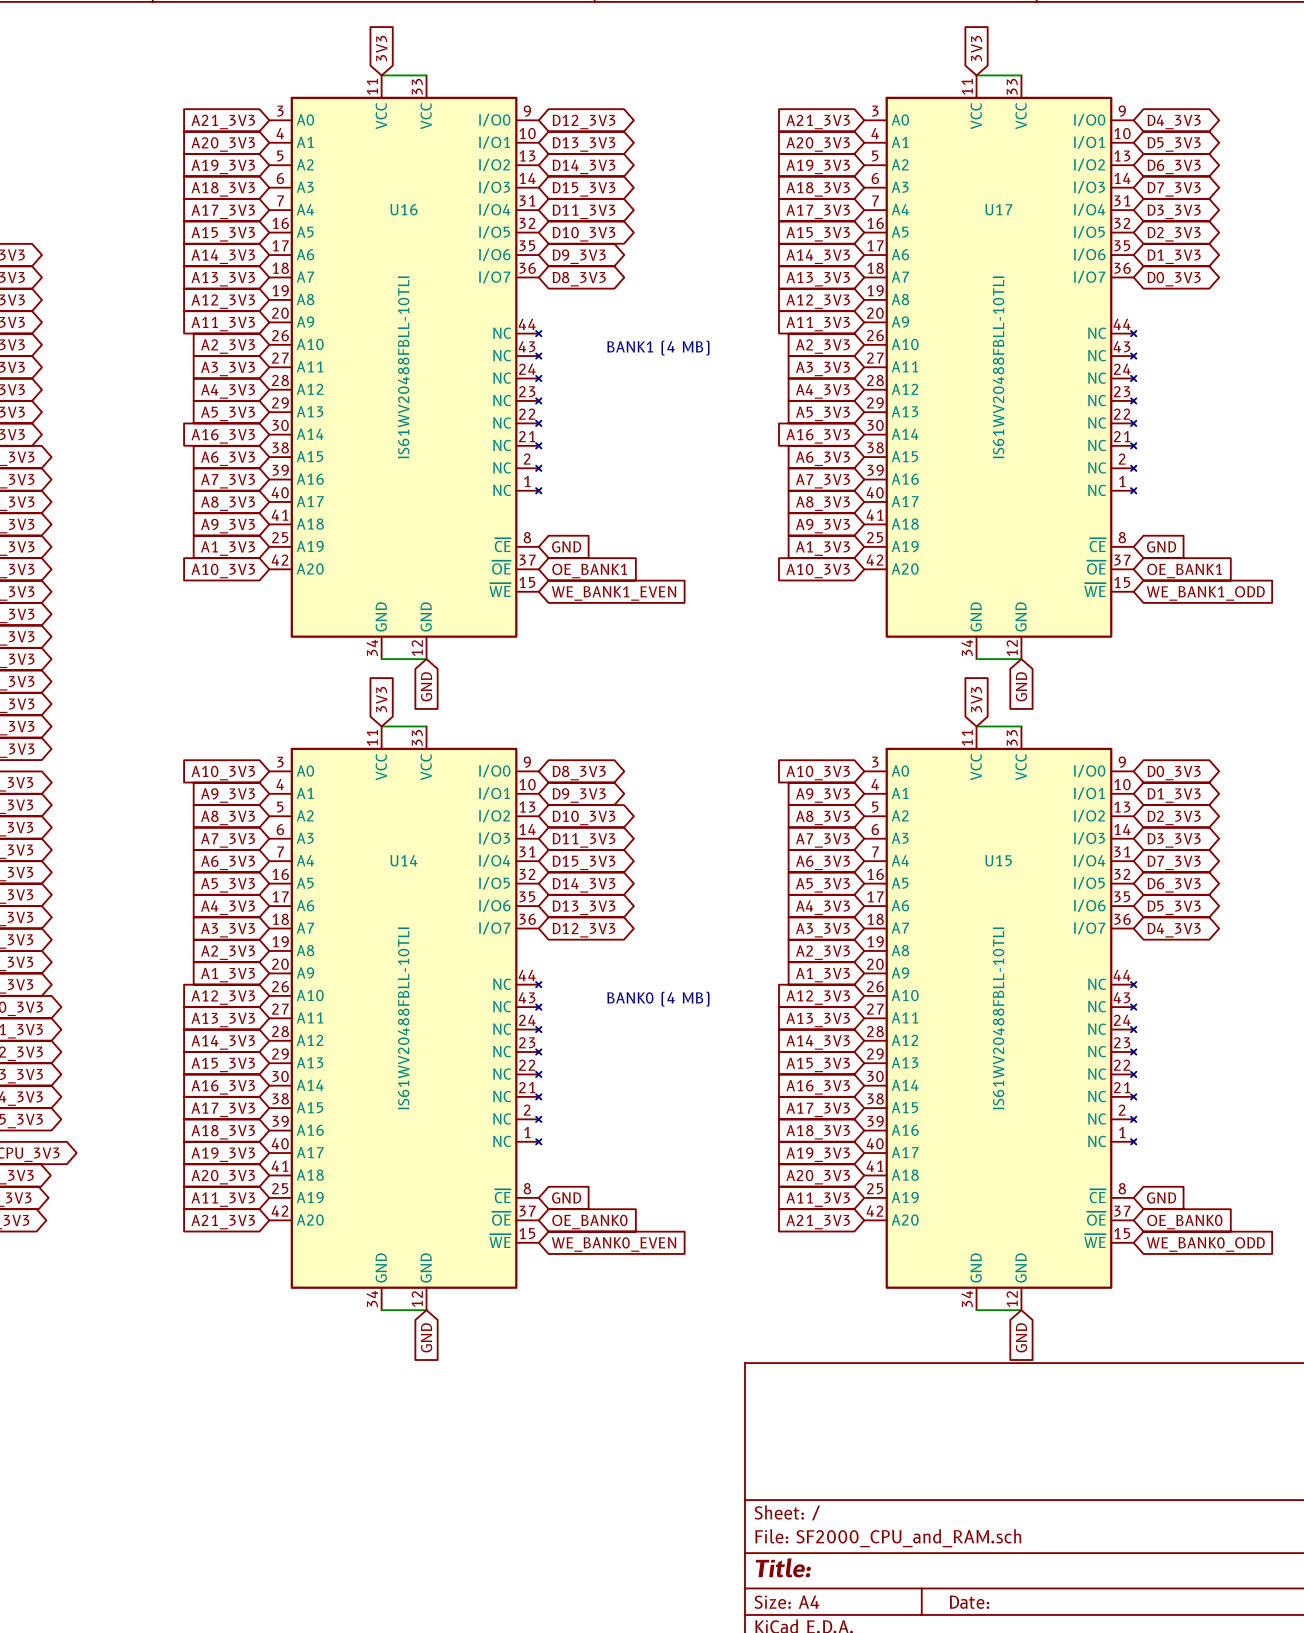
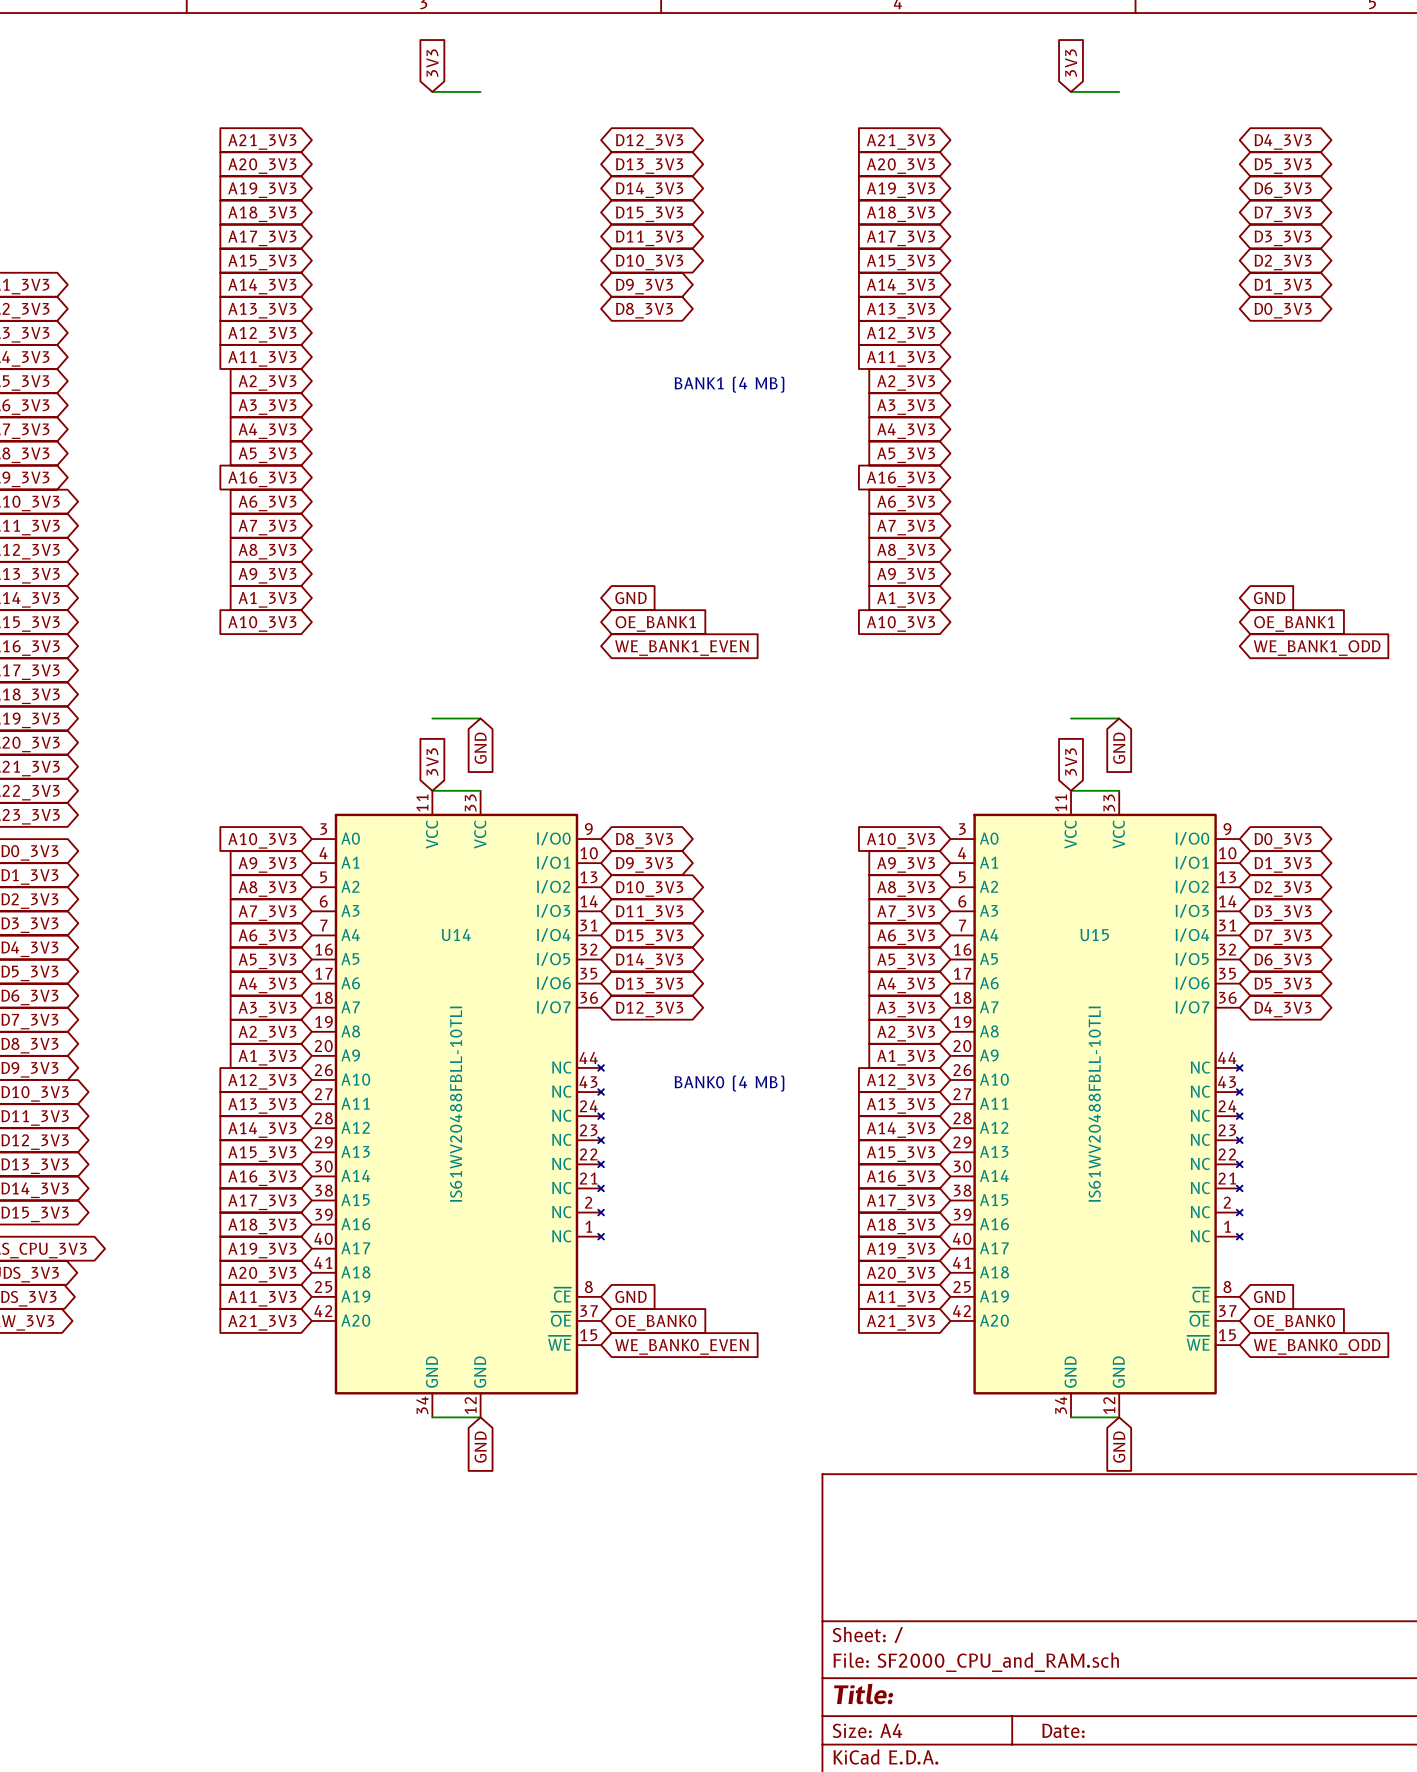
U16: IS61WV20488FBLL-10TLI (405, 367) -> none
U17: IS61WV20488FBLL-10TLI (1000, 367) -> none

